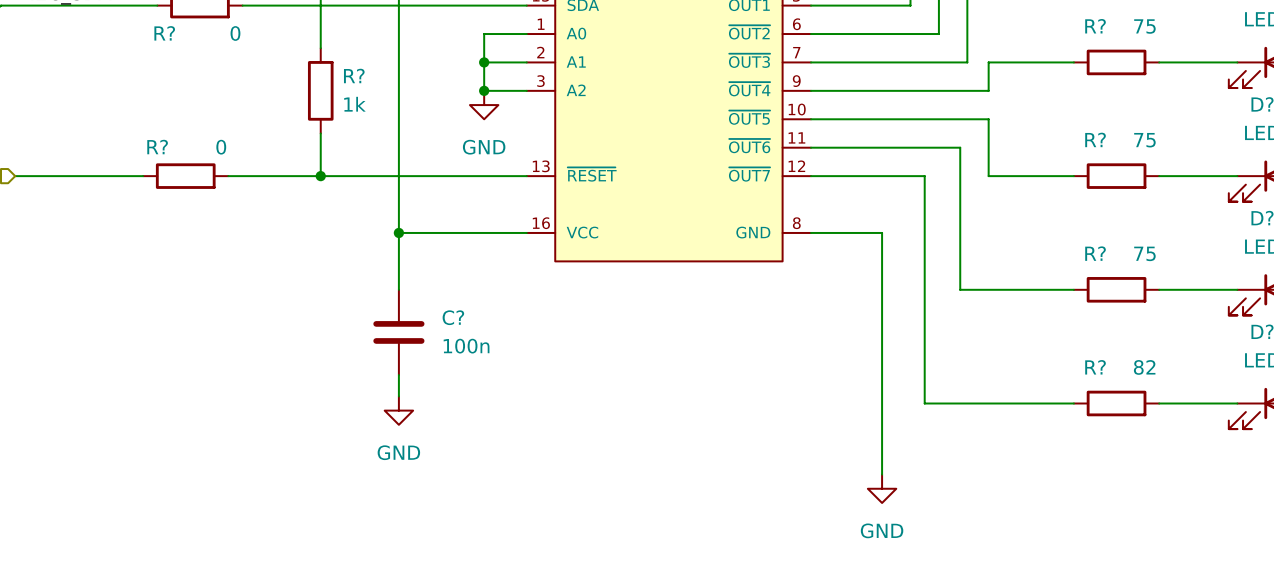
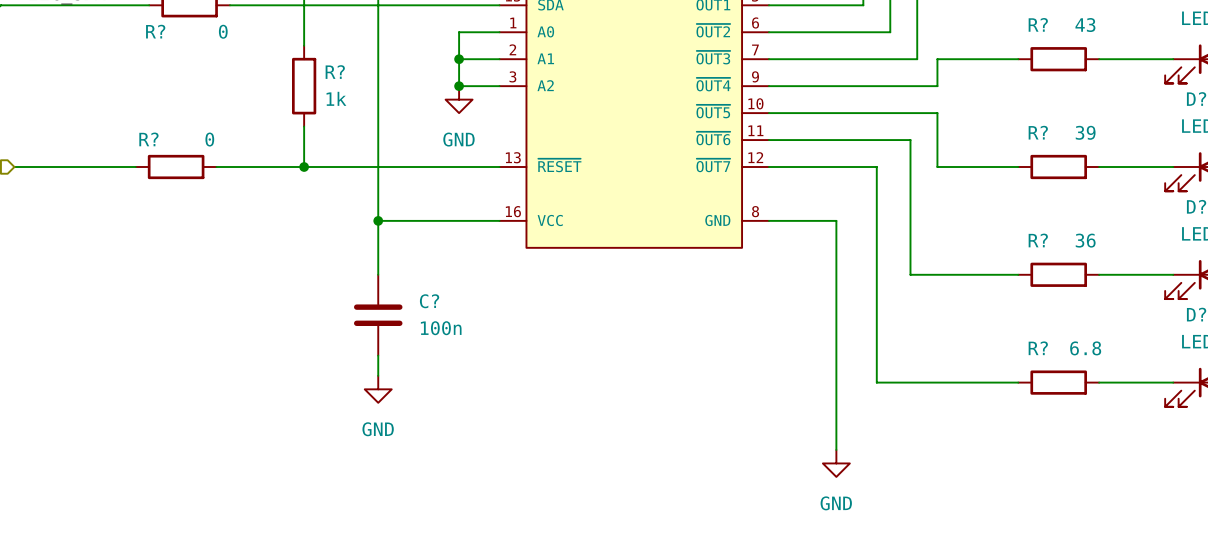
R? value: 75 (1144, 26) -> 43 (1085, 25)
R? value: 75 (1144, 140) -> 39 (1085, 132)
R? value: 75 (1144, 253) -> 36 (1085, 240)
R? value: 82 (1144, 367) -> 6.8 (1085, 348)

